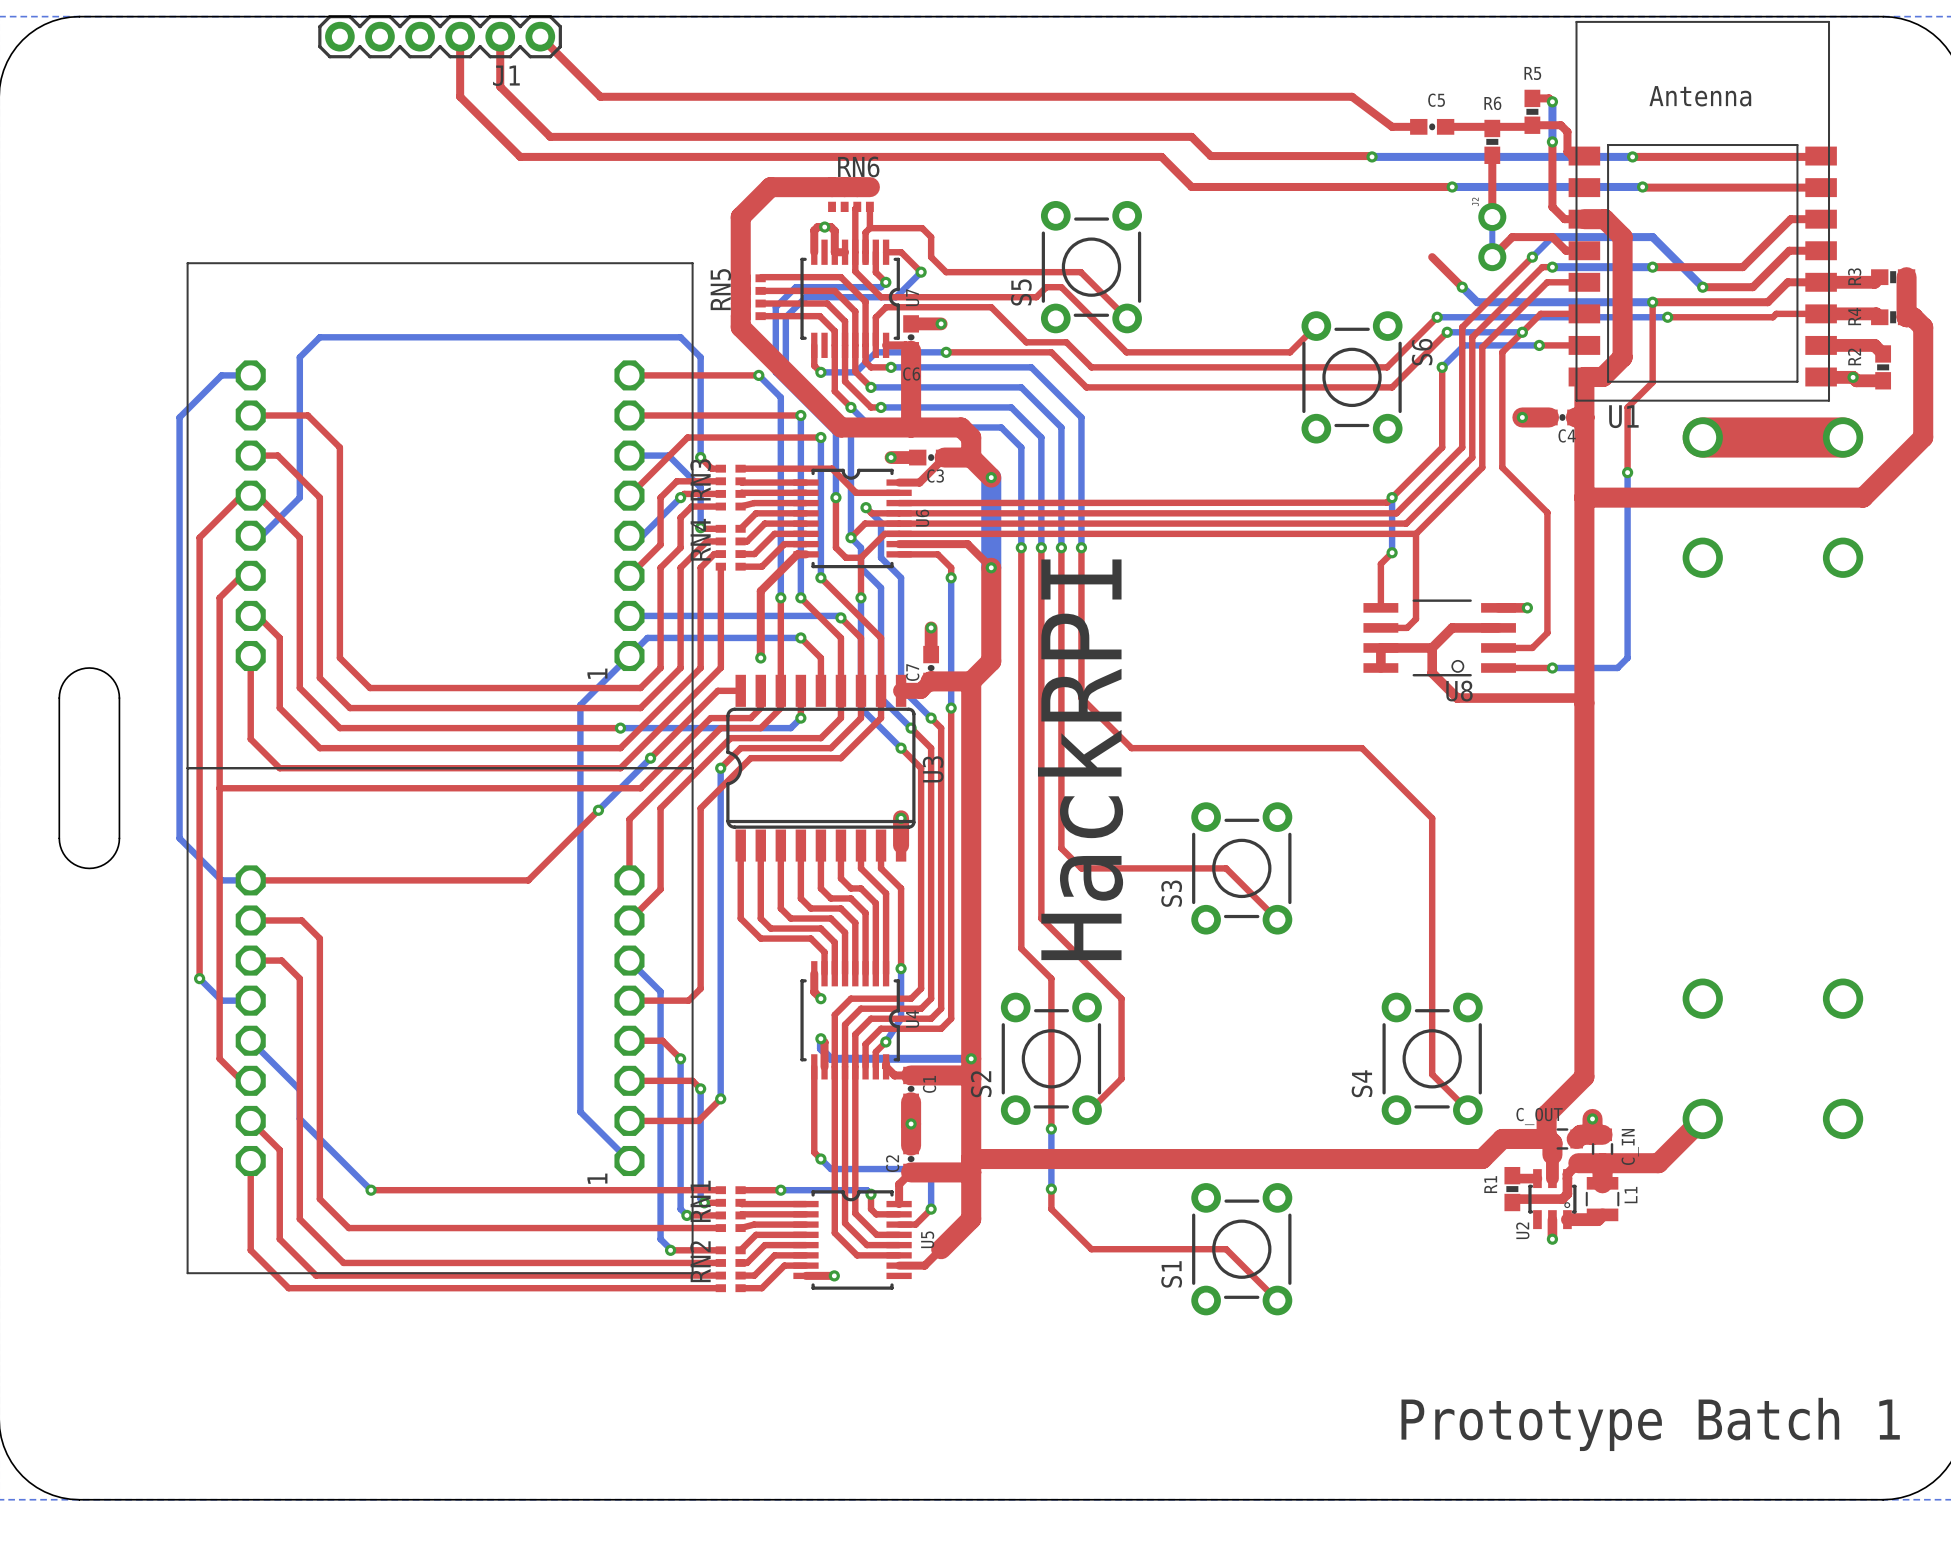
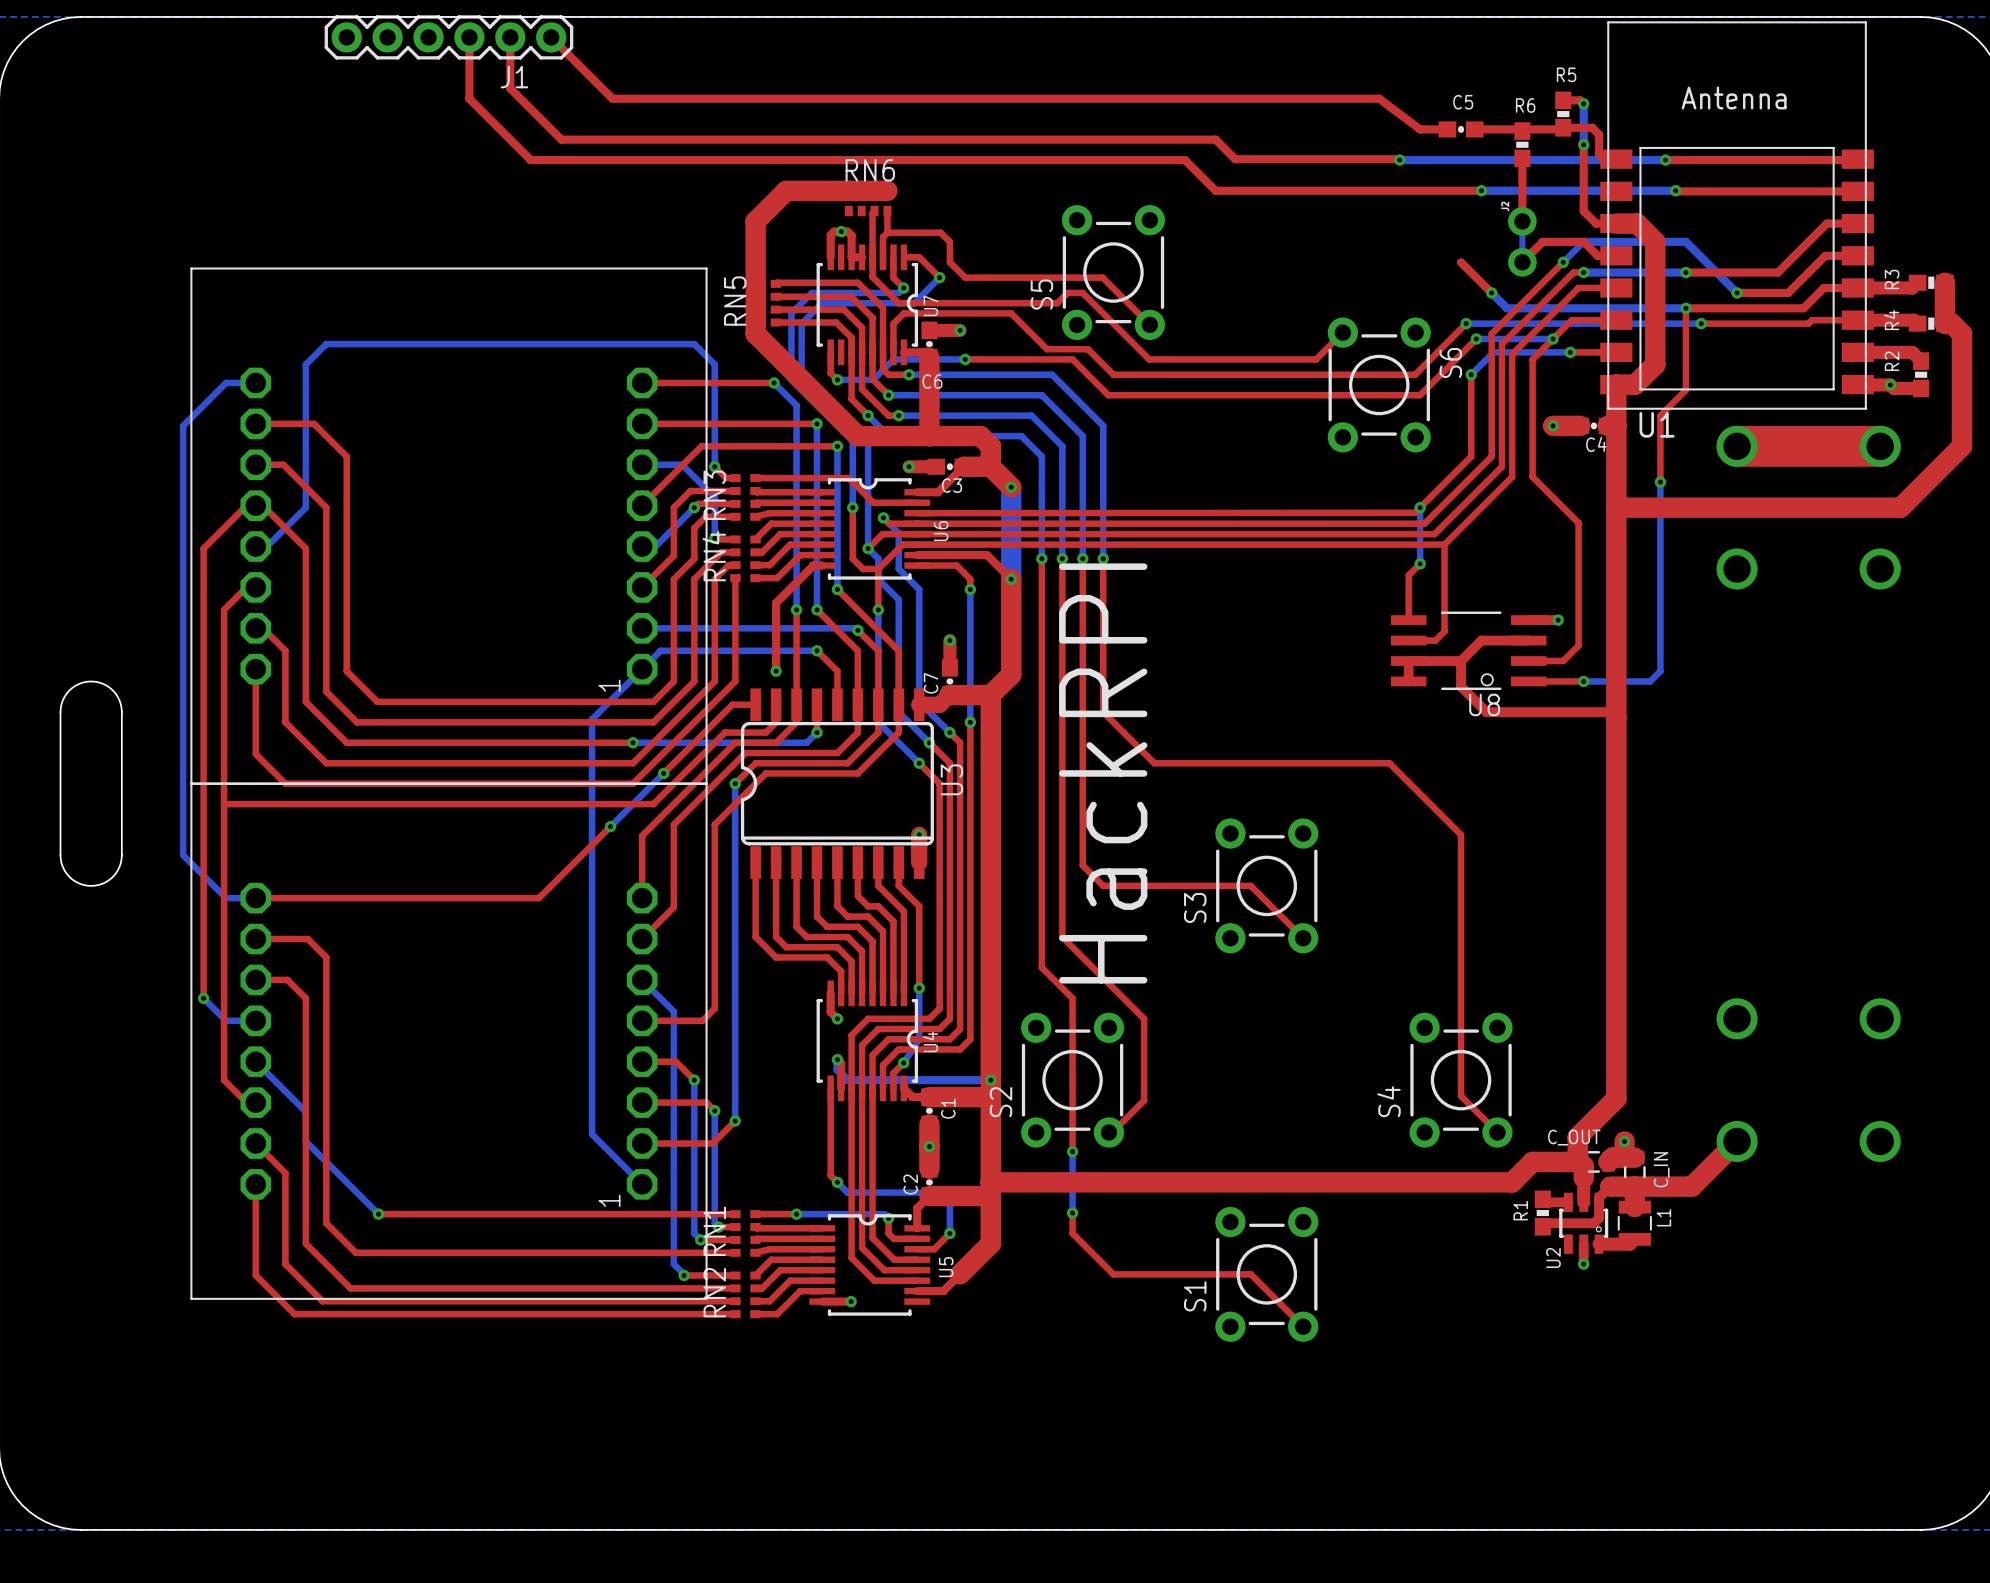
text: Prototype Batch 1 (1650, 1424) -> none

